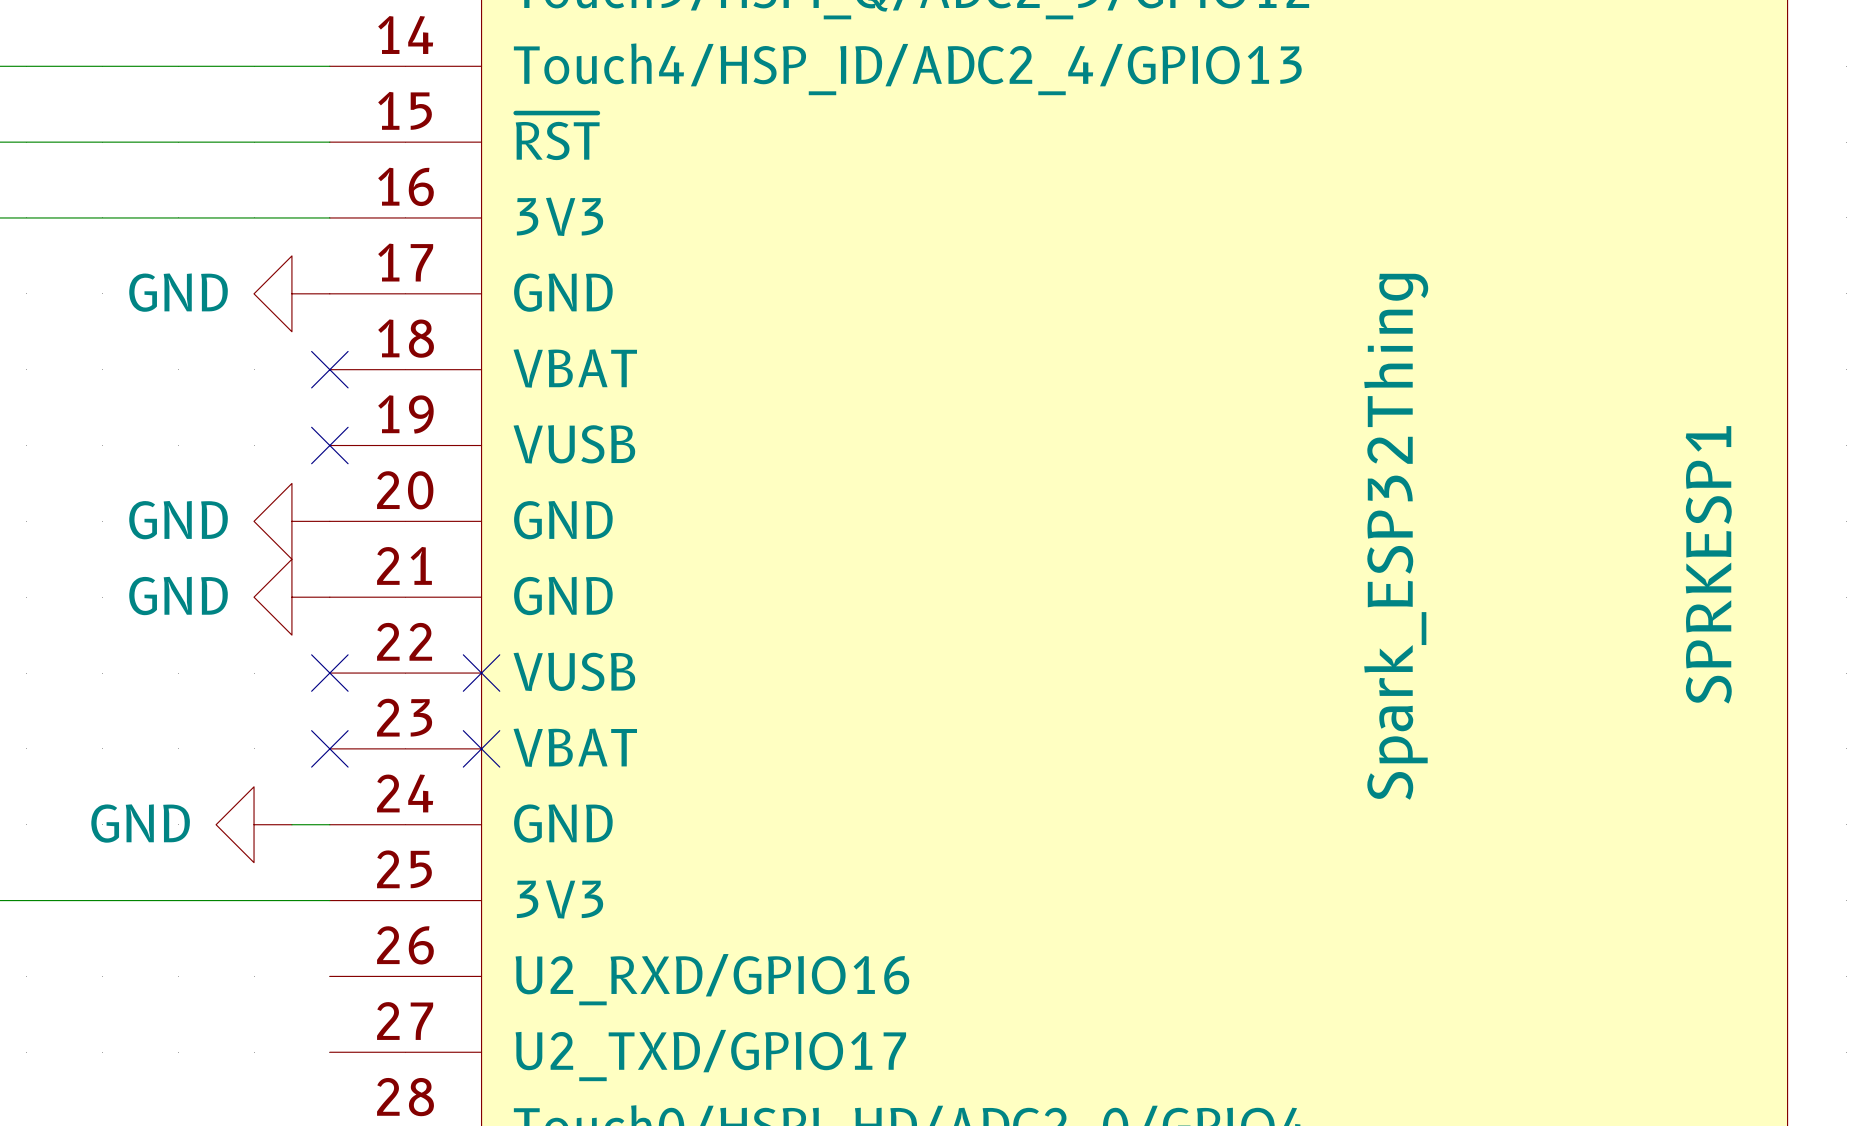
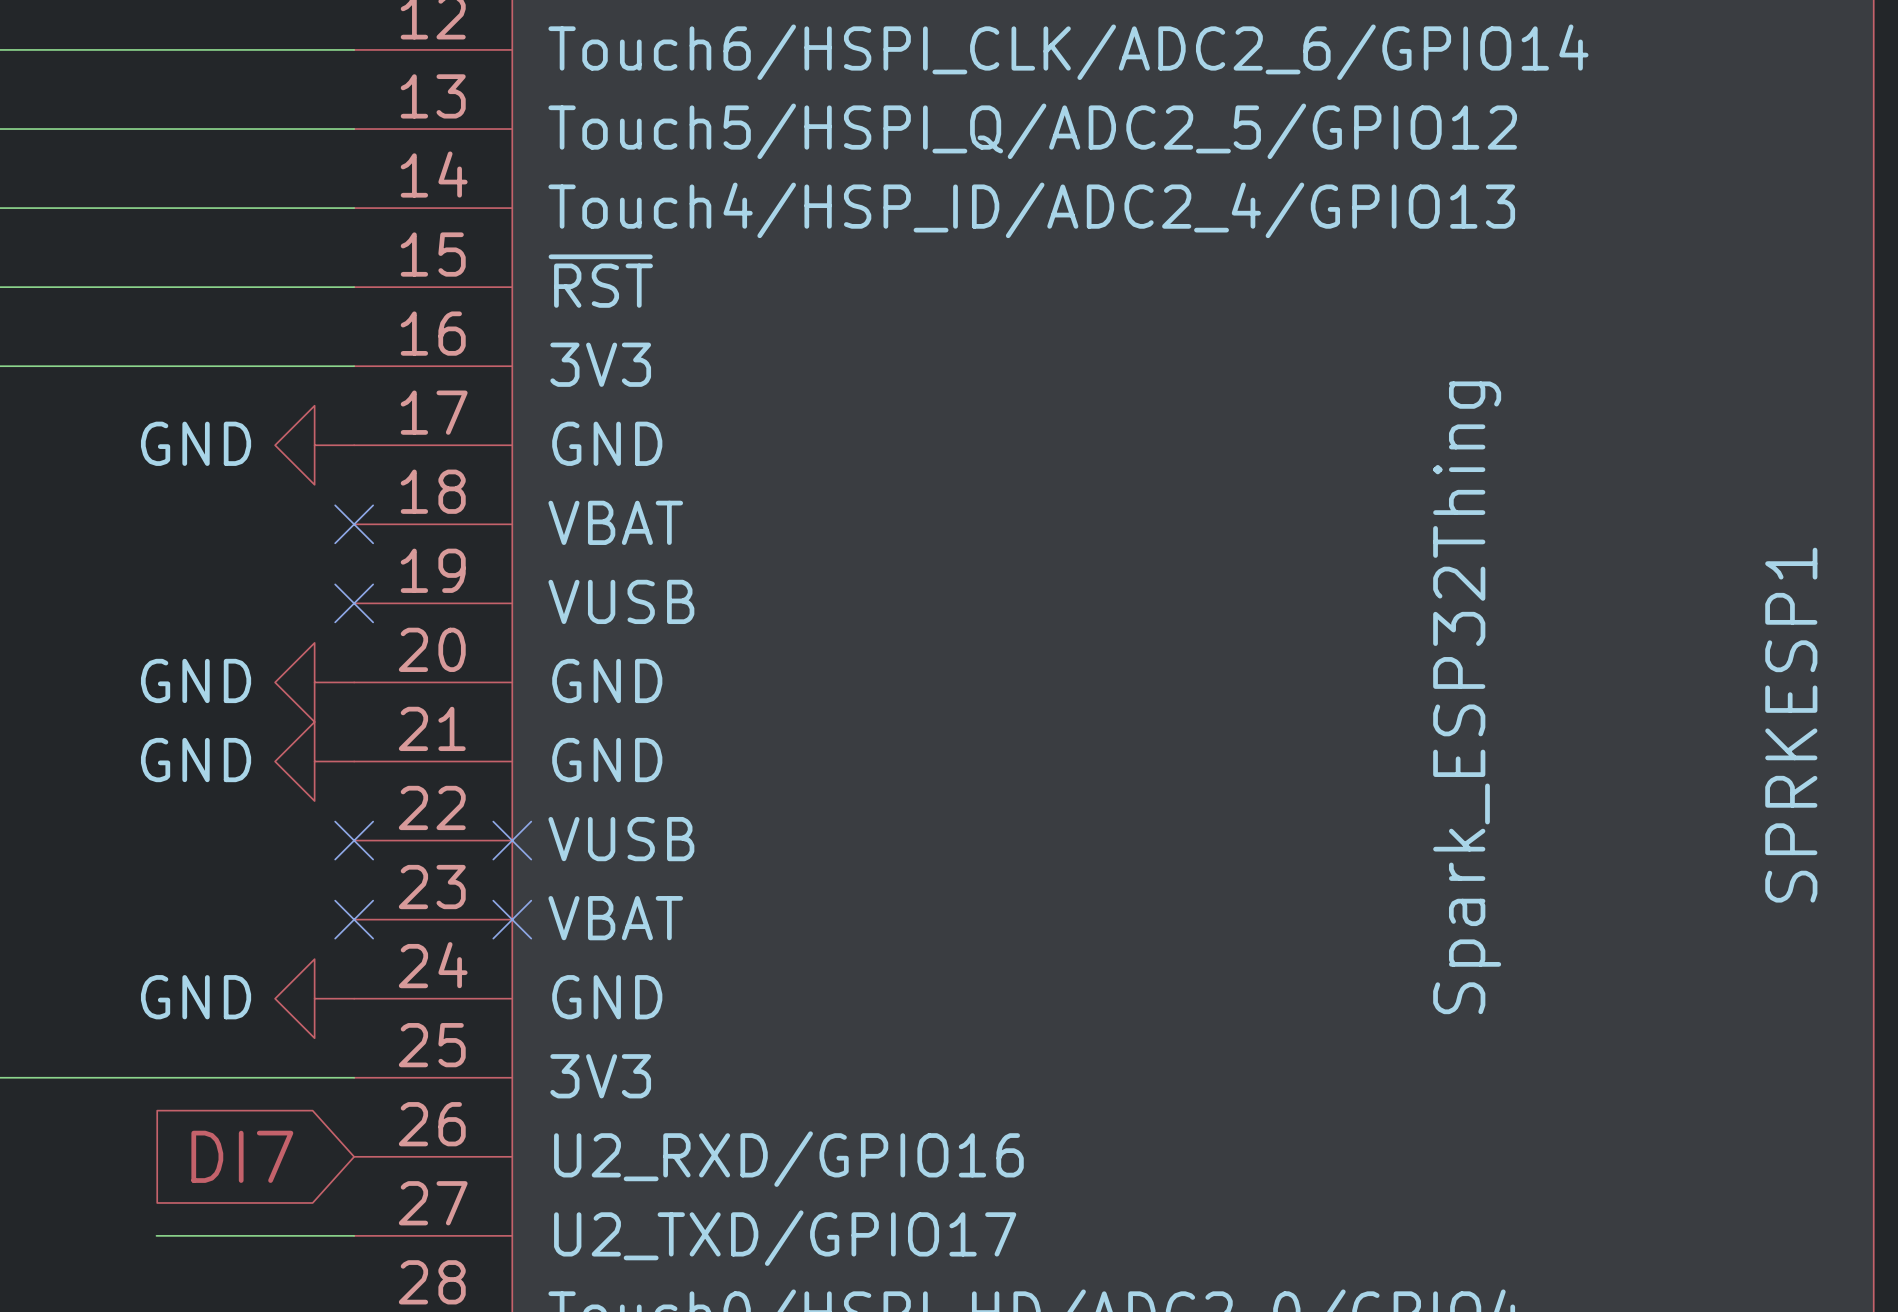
power symbol position: GND (254, 824) -> GND (314, 998)
global label: none -> DI7 (242, 1156)
wire: none -> (156, 1235) (354, 1235)

